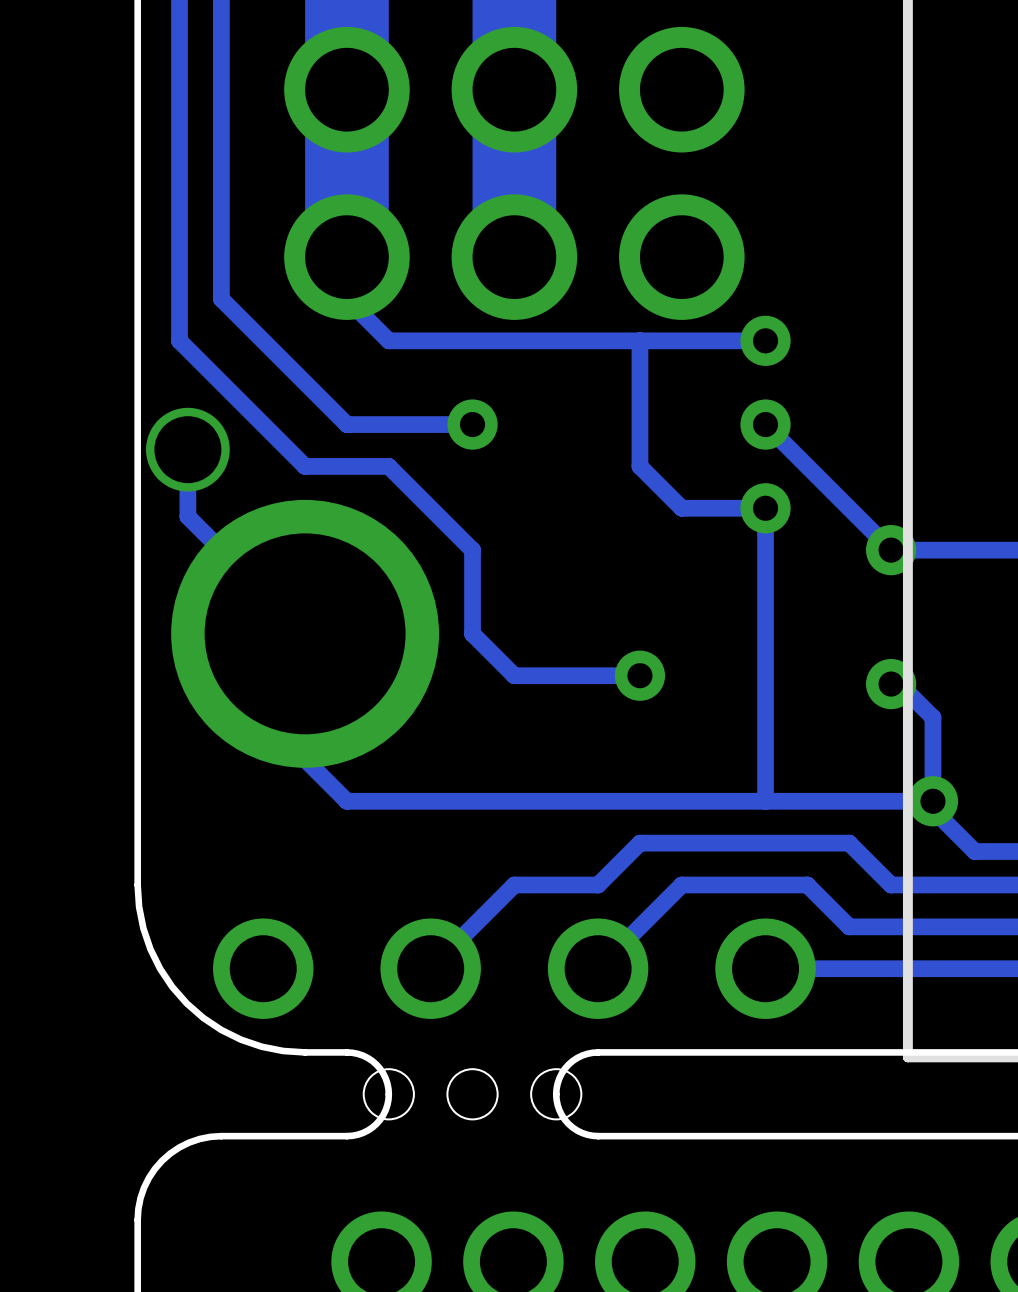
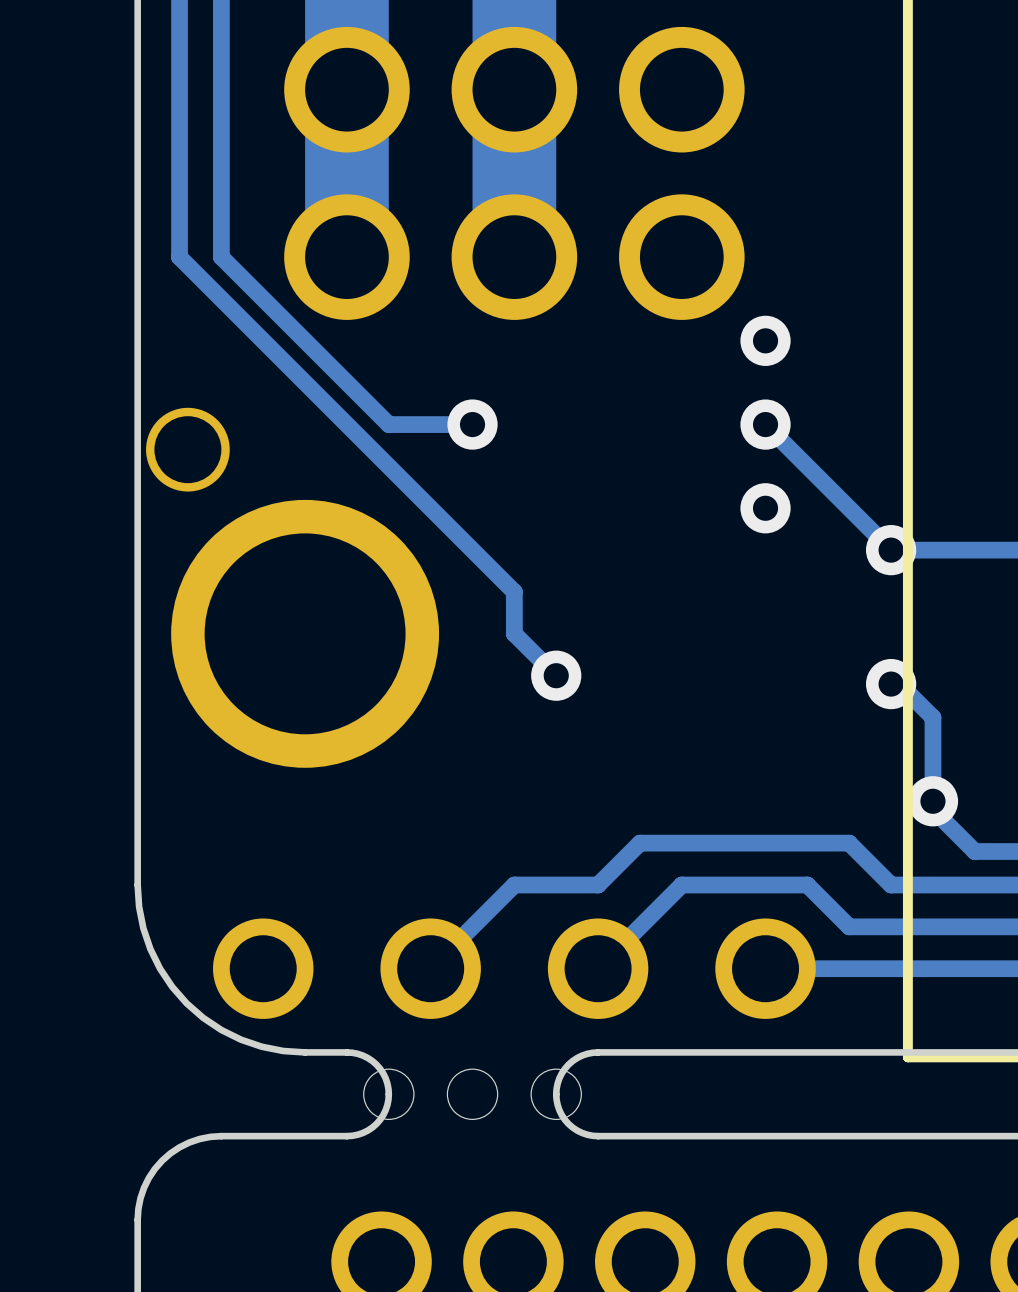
track: (179, 257) (179, 340) (305, 466) (388, 466) -> none
track: (221, 257) (221, 298) -> (179, 257) (221, 298)
track: none -> (221, 257) (388, 424)
track: (346, 257) (346, 298) (388, 340) (765, 340) -> none
track: (639, 340) (639, 466) (681, 508) (765, 508) (765, 801) -> none
track: (388, 424) (346, 424) -> (388, 466) (346, 424)
track: (187, 449) (187, 516) (305, 633) (305, 759) (346, 801) (932, 801) -> none
track: (472, 550) (472, 633) (514, 675) (639, 675) -> (472, 550) (514, 591) (514, 633) (556, 675)
via position: (639, 675) -> (556, 675)

